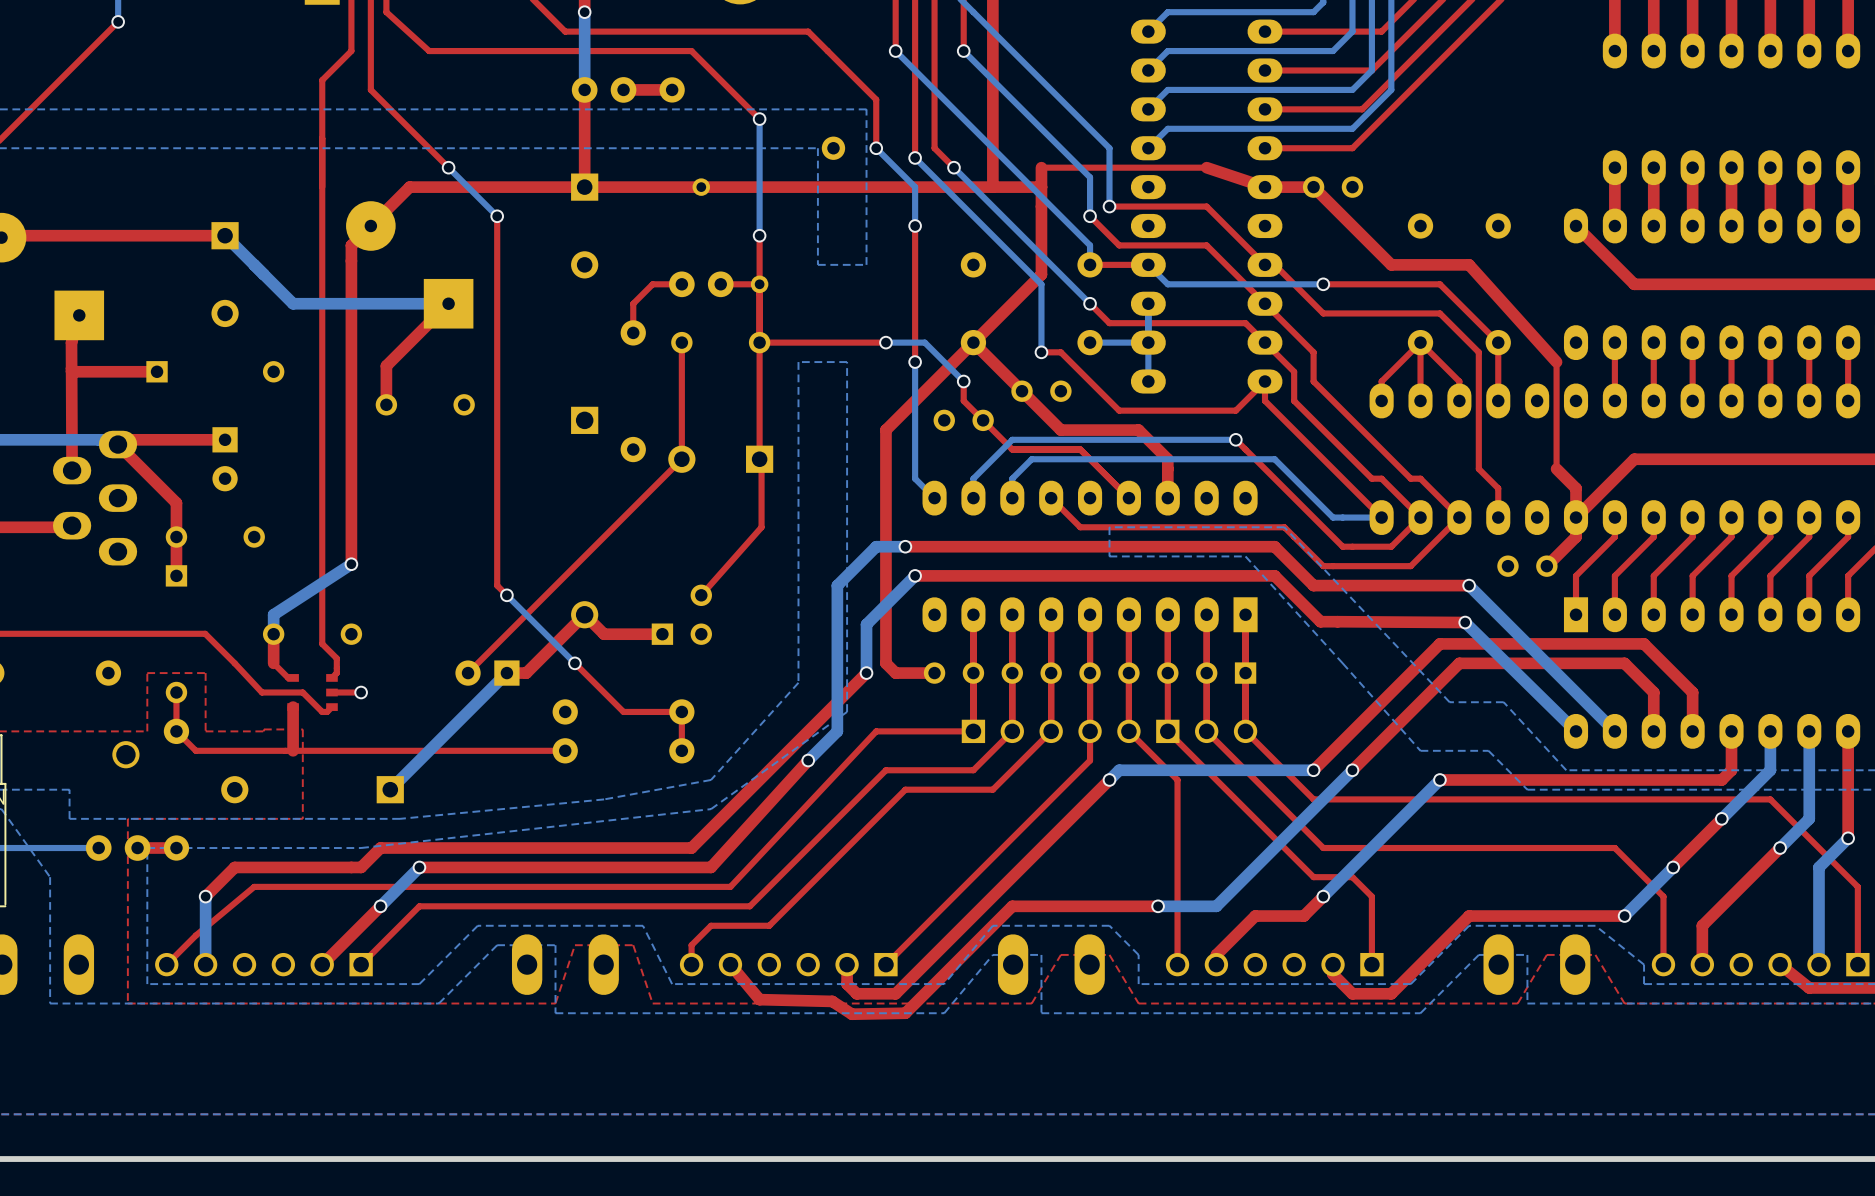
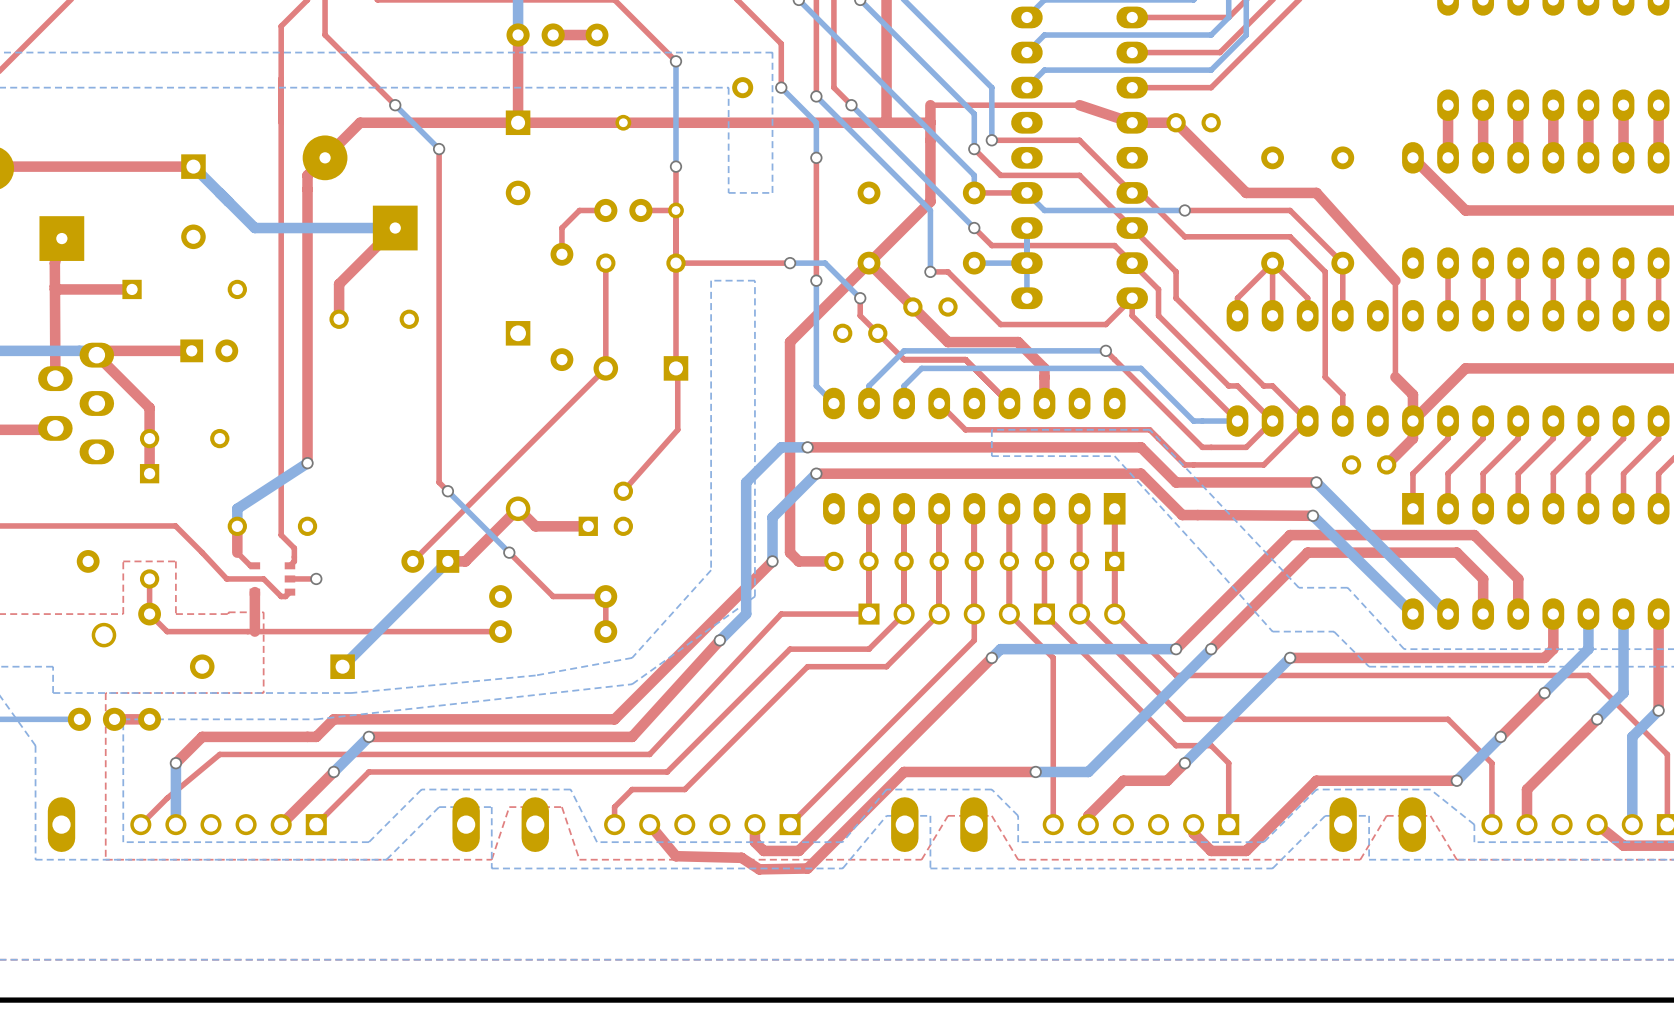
part rotation: 0° (225, 459) -> 90° counterclockwise (209, 350)

